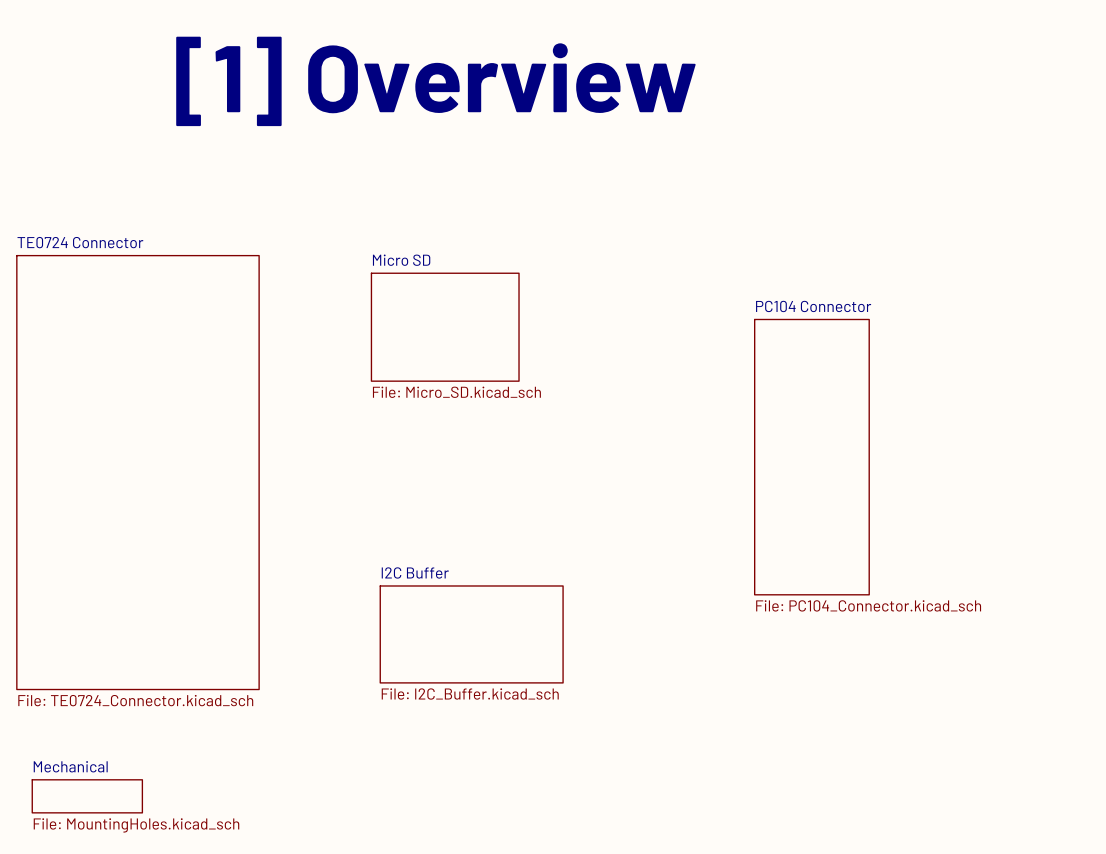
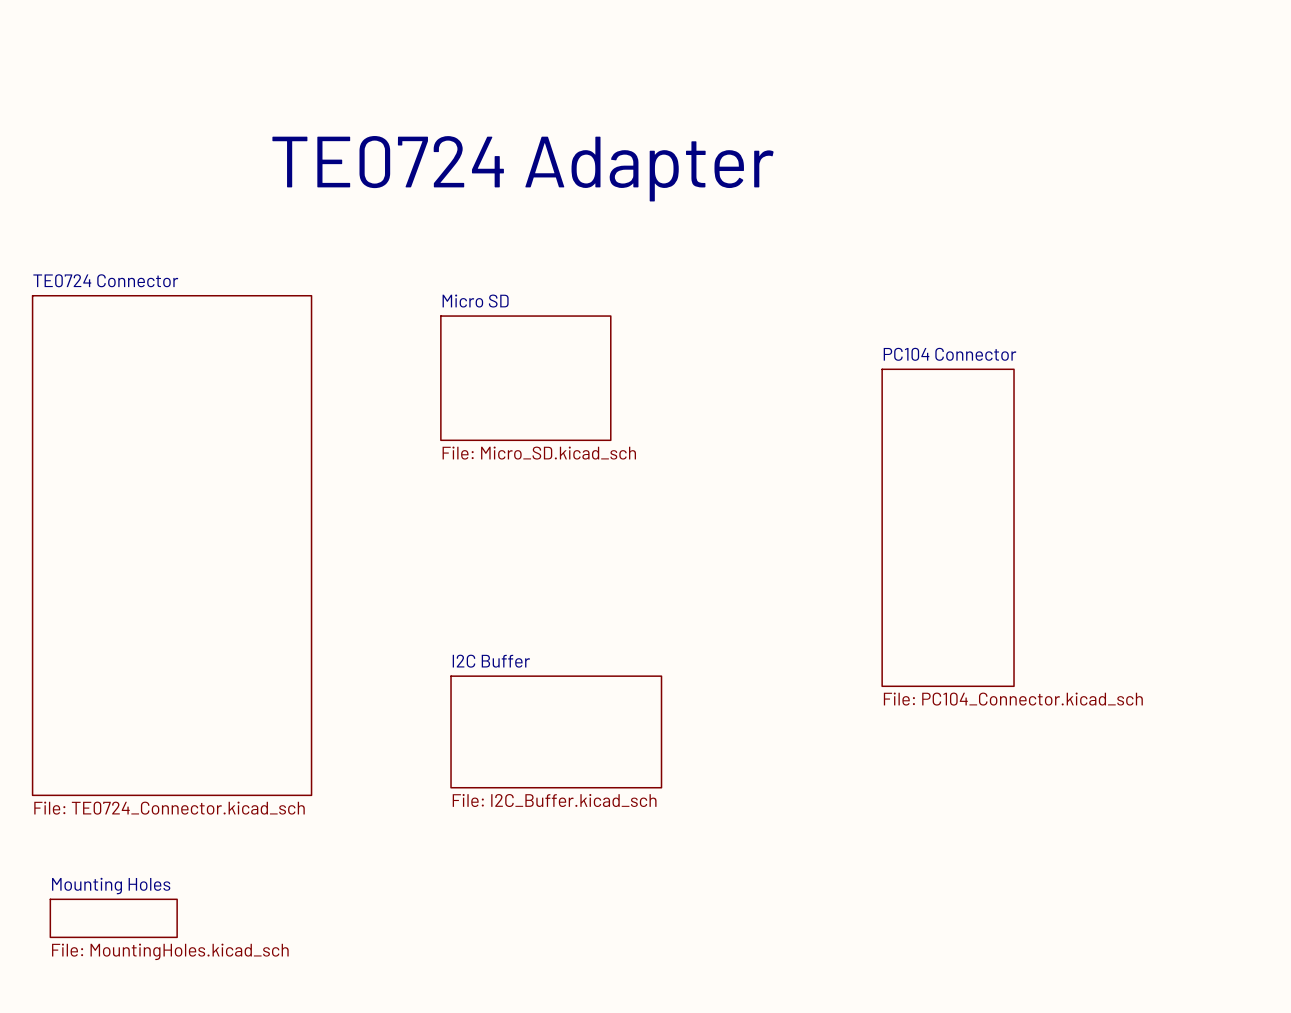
text: [1] Overview (435, 81) -> none
text: none -> TE0724 Adapter (523, 168)
sheet Mechanical name: Mechanical (70, 766) -> Mounting Holes (111, 886)

